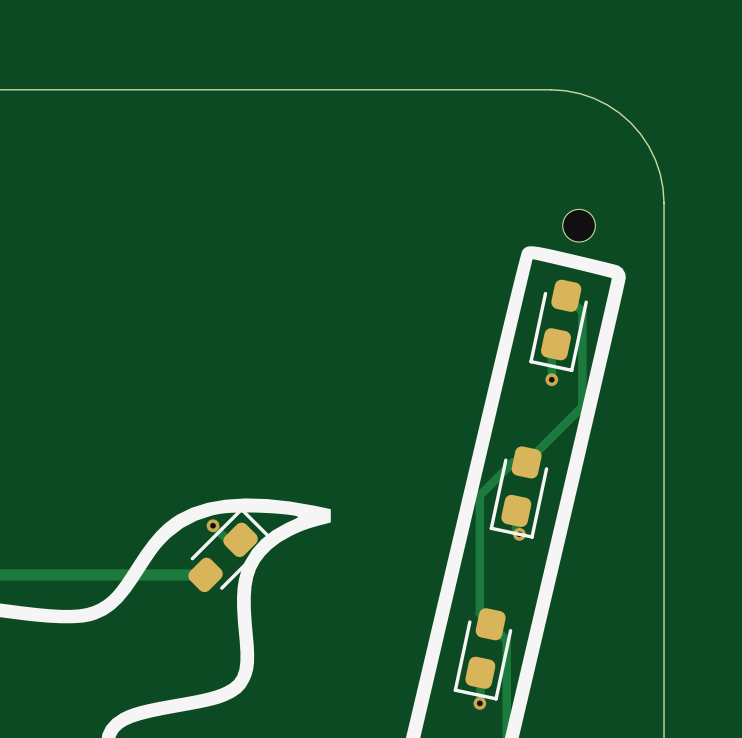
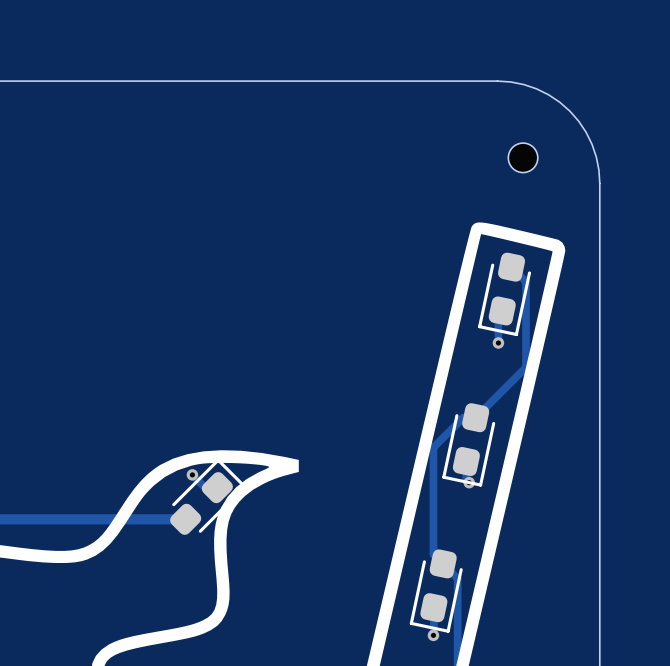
part position: (579, 225) -> (523, 157)

